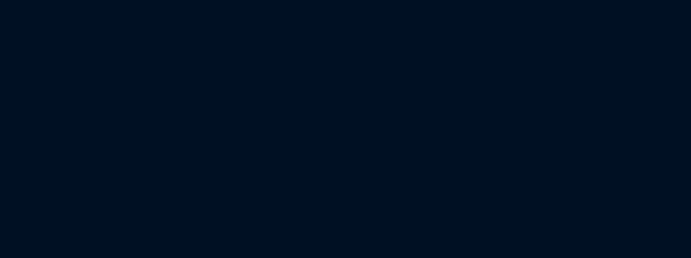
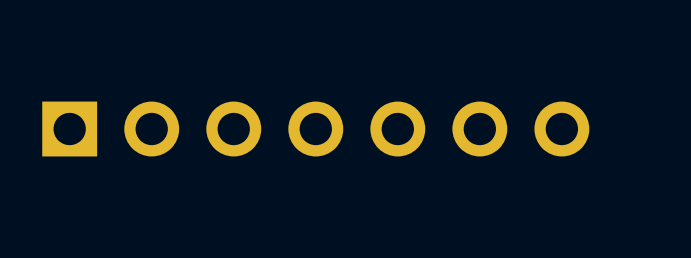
part: none -> (315, 129)

